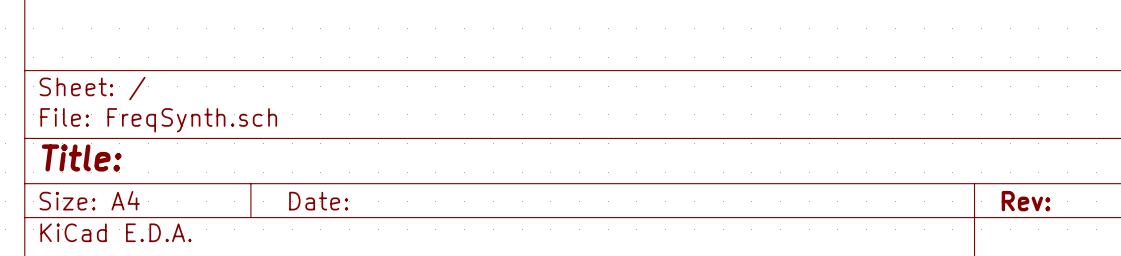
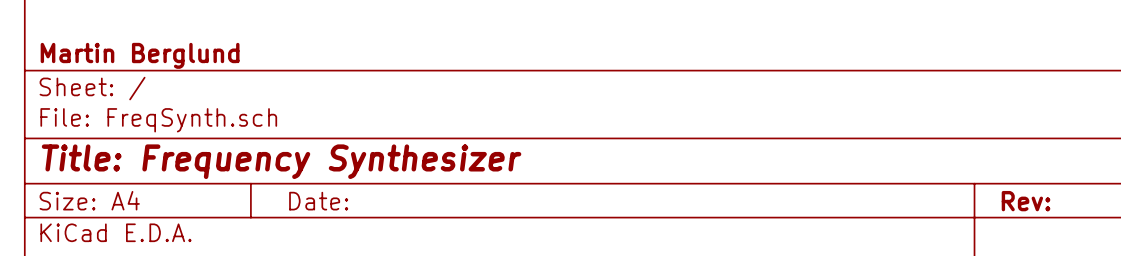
title block: none -> Martin Berglund (140, 55)
title block: Title: (81, 157) -> Title: Frequency Synthesizer (281, 161)

